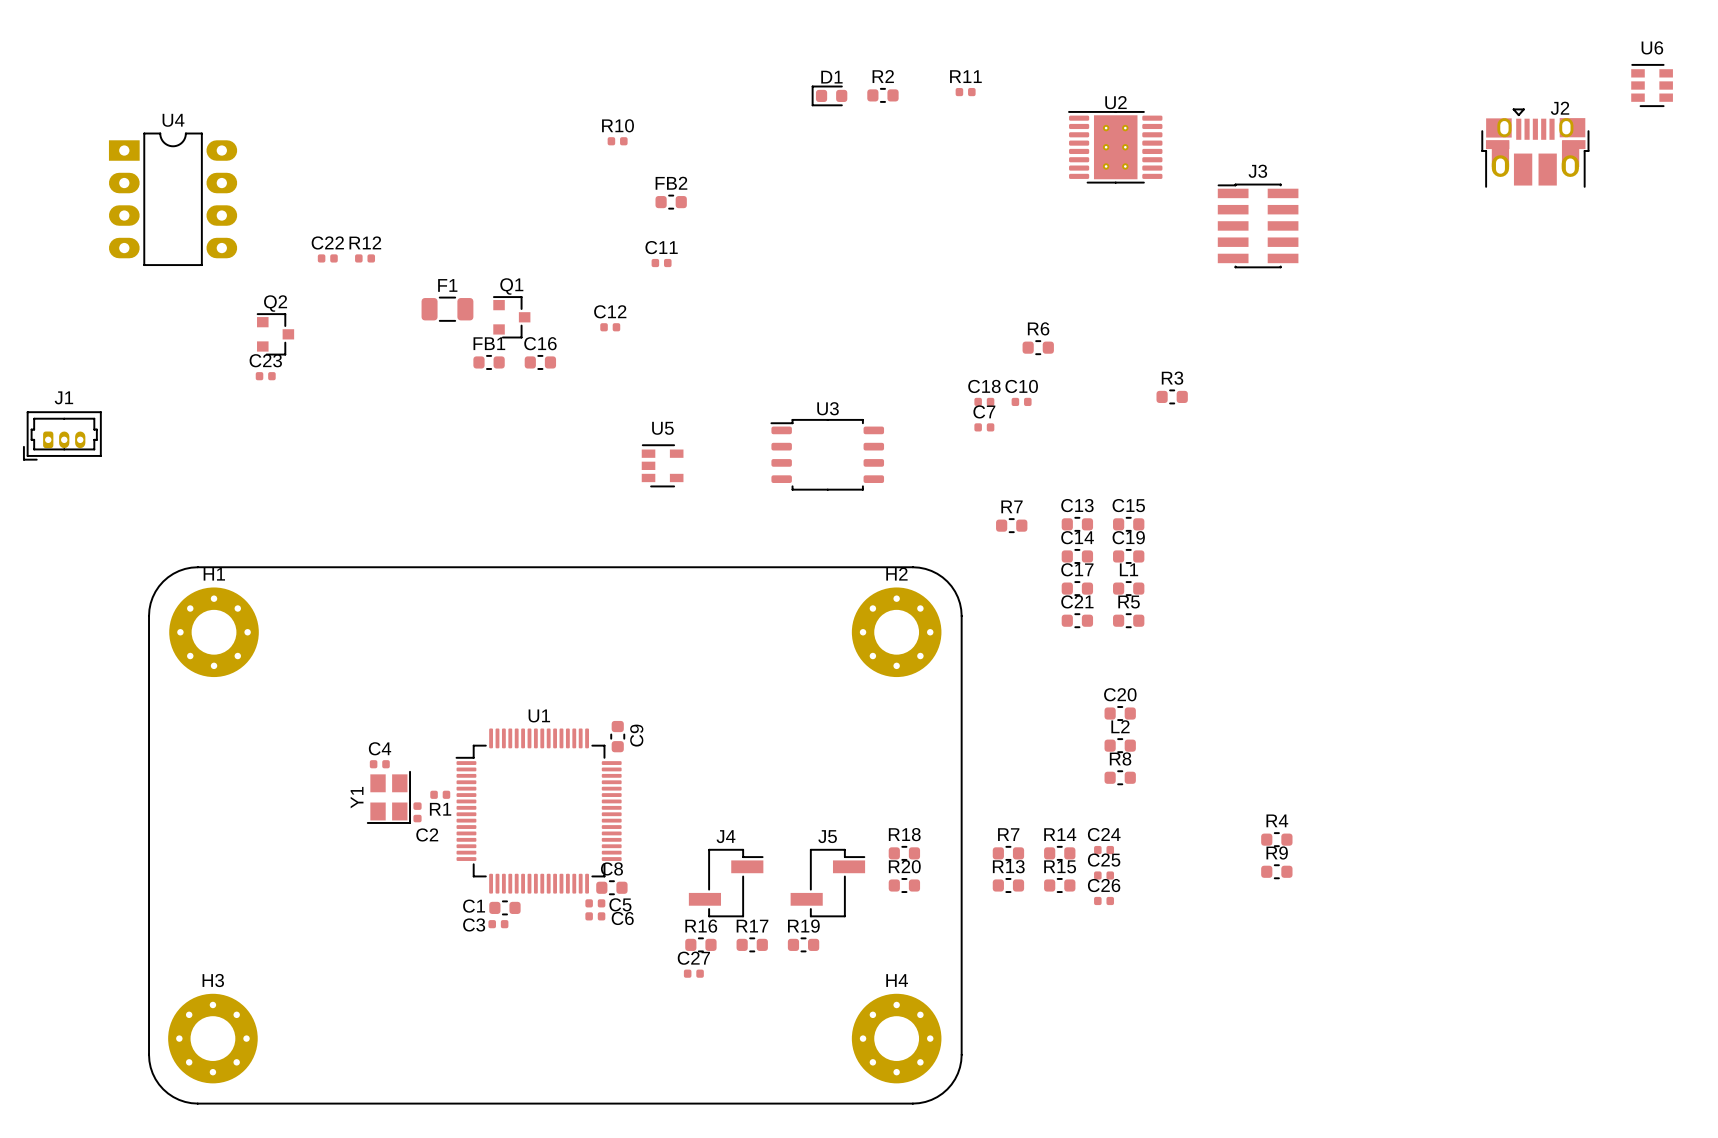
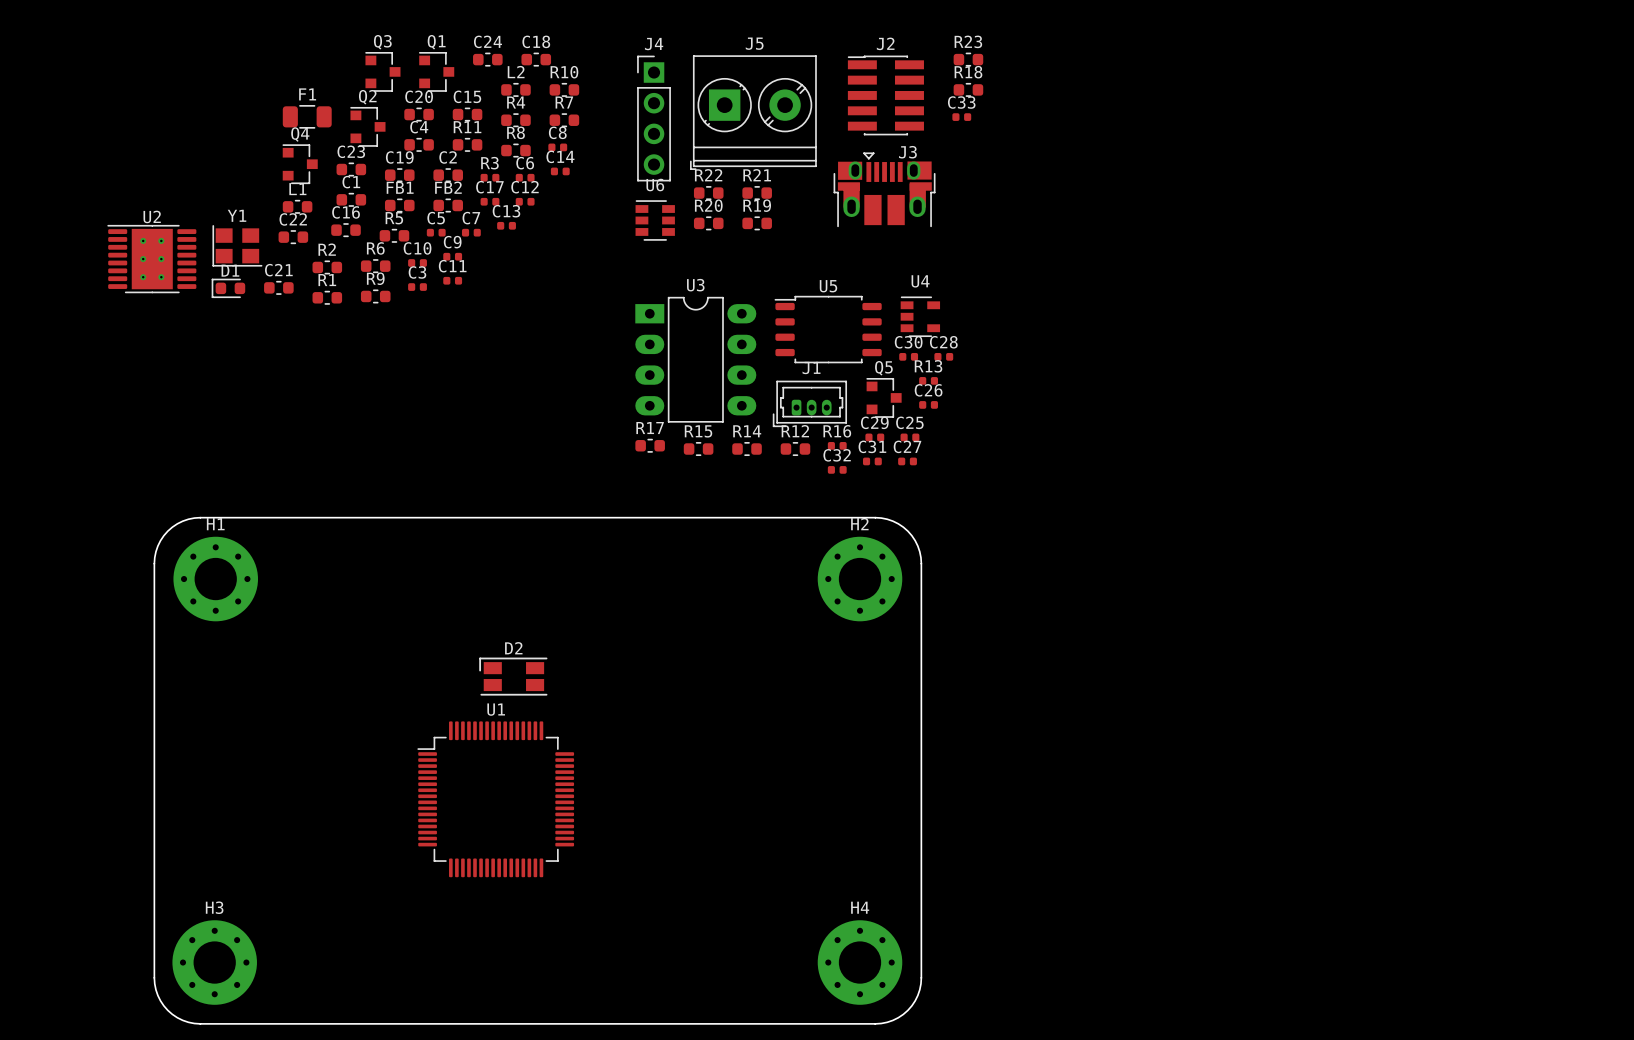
R23: none -> (968, 59)
U6 position: (1652, 85) -> (655, 220)
R11 footprint: [955, 87, 976, 97] -> [452, 137, 483, 152]
Q3: none -> (382, 71)
D1 position: (829, 95) -> (228, 288)
R2 position: (882, 95) -> (327, 267)
J2 footprint: [1481, 108, 1590, 188] -> [847, 55, 924, 136]
J2 name position: J2 (1560, 108) -> J2 (885, 43)
U4 name position: U4 (173, 120) -> U4 (920, 281)
U4 footprint: [108, 132, 238, 266] -> [900, 296, 941, 337]
R10 footprint: [607, 137, 628, 146] -> [549, 83, 580, 97]
C33: none -> (961, 117)
R7: none -> (564, 120)
U2 position: (1115, 147) -> (151, 259)
J3 name position: J3 (1257, 171) -> J3 (907, 152)
J3 footprint: [1217, 183, 1299, 269] -> [833, 152, 936, 228]
Q4: none -> (300, 164)
FB2 position: (671, 202) -> (448, 205)
R22: none -> (708, 193)
R21: none -> (757, 193)
C22 footprint: [317, 254, 338, 263] -> [278, 230, 309, 245]
R12 footprint: [355, 254, 376, 263] -> [780, 442, 811, 456]
C11 position: (661, 263) -> (452, 280)
F1 position: (447, 309) -> (307, 116)
Q1 position: (511, 317) -> (436, 71)
C12 position: (610, 327) -> (525, 201)
Q2 position: (275, 334) -> (367, 126)
R6 position: (1038, 347) -> (375, 266)
FB1 position: (489, 362) -> (399, 205)
C16 position: (540, 362) -> (346, 230)
C23 footprint: [255, 372, 276, 381] -> [336, 162, 367, 177]
R3 footprint: [1156, 389, 1188, 405] -> [480, 173, 500, 182]
C30: none -> (908, 356)
C28: none -> (943, 356)
C18 footprint: [974, 397, 995, 407] -> [521, 52, 552, 67]
C10 position: (1021, 401) -> (417, 263)
U3 name position: U3 (828, 408) -> U3 (695, 285)
U3 footprint: [770, 419, 885, 491] -> [635, 296, 757, 423]
C7 position: (984, 427) -> (471, 232)
J1 position: (62, 435) -> (809, 403)
Q5: none -> (884, 397)
U5 footprint: [641, 444, 684, 488] -> [774, 295, 882, 364]
C29: none -> (874, 437)
C31: none -> (872, 461)
C32: none -> (837, 469)
C13 footprint: [1061, 517, 1094, 532] -> [497, 221, 516, 230]
C15 position: (1128, 524) -> (467, 114)
R7: (1011, 525) -> none
C14 footprint: [1061, 549, 1094, 564] -> [550, 167, 570, 176]
C19 position: (1128, 556) -> (399, 175)
C17 footprint: [1061, 581, 1094, 596] -> [480, 197, 500, 206]
L1 position: (1128, 588) -> (297, 206)
C21 position: (1077, 620) -> (278, 287)
R5 position: (1128, 620) -> (394, 235)
C20 position: (1120, 713) -> (419, 114)
C9 footprint: [610, 720, 626, 753] -> [443, 252, 463, 261]
D2: none -> (513, 676)
L2 position: (1120, 745) -> (515, 89)
C4 footprint: [369, 760, 390, 769] -> [404, 137, 434, 152]
R8 position: (1120, 777) -> (515, 150)
R1 footprint: [430, 790, 451, 799] -> [312, 290, 343, 305]
Y1 rotation: 0° (388, 797) -> 90° clockwise (237, 245)
Y1 position: (388, 797) -> (237, 245)
C2 footprint: [413, 802, 422, 823] -> [433, 168, 464, 183]
R1 name position: R1 (440, 809) -> R1 (327, 280)
U1 position: (538, 811) -> (495, 799)
C2 name position: C2 (427, 834) -> C2 (448, 157)
J4 name position: J4 (725, 836) -> J4 (654, 44)
J5 name position: J5 (827, 836) -> J5 (754, 43)
R4 position: (1276, 839) -> (515, 120)
C24 footprint: [1094, 845, 1115, 855] -> [473, 52, 503, 67]
J4 footprint: [688, 849, 764, 918] -> [637, 55, 671, 182]
J5 footprint: [790, 849, 866, 918] -> [690, 55, 817, 170]
R18 position: (904, 853) -> (968, 89)
R7: (1008, 853) -> none
R14 position: (1059, 853) -> (747, 449)
R9 position: (1276, 871) -> (375, 296)
C25 position: (1104, 875) -> (909, 437)
R13 footprint: [992, 878, 1025, 893] -> [919, 377, 938, 385]
C8 footprint: [596, 880, 628, 896] -> [548, 143, 568, 152]
R20 position: (904, 885) -> (708, 223)
R15 position: (1059, 885) -> (698, 449)
C26 position: (1104, 900) -> (928, 404)
C5 position: (595, 903) -> (436, 232)
C5 name position: C5 (620, 904) -> C5 (436, 218)
C1 name position: C1 (474, 906) -> C1 (351, 182)
C1 position: (504, 907) -> (351, 199)
C6 position: (595, 916) -> (525, 177)
C6 name position: C6 (622, 918) -> C6 (525, 163)
C3 name position: C3 (474, 924) -> C3 (417, 272)
C3 position: (498, 924) -> (417, 287)
R16 footprint: [685, 937, 717, 953] -> [827, 442, 847, 450]
R17 position: (752, 944) -> (650, 445)
R19 position: (803, 944) -> (757, 223)
C27 position: (693, 973) -> (907, 461)

